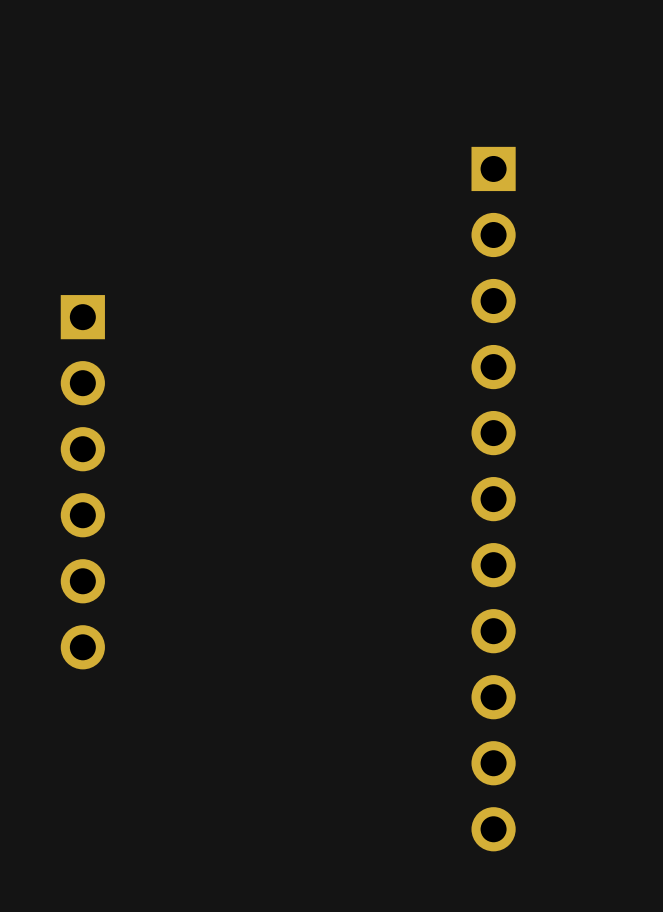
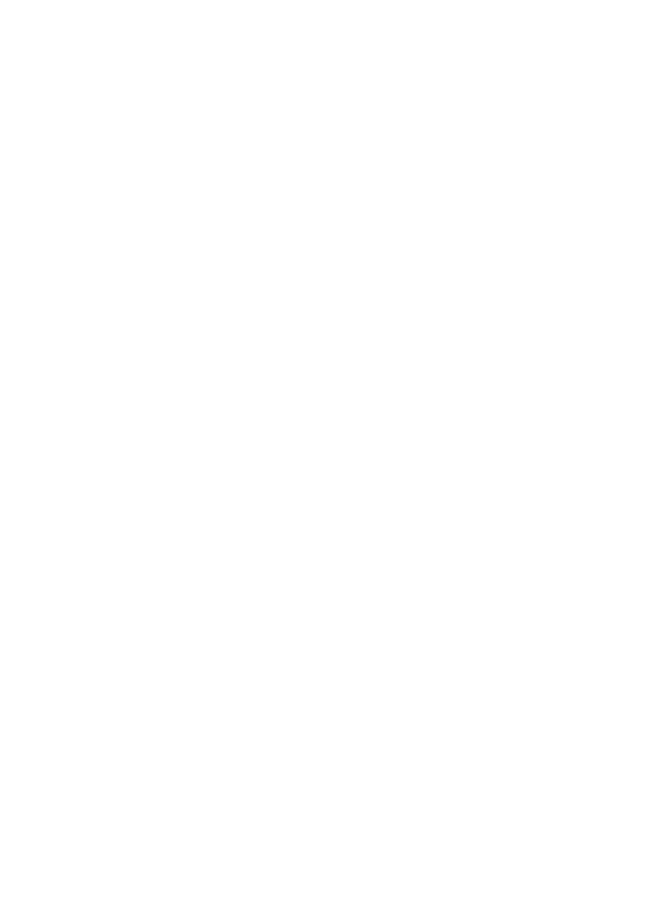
part: (82, 482) -> none
part: (493, 499) -> none

